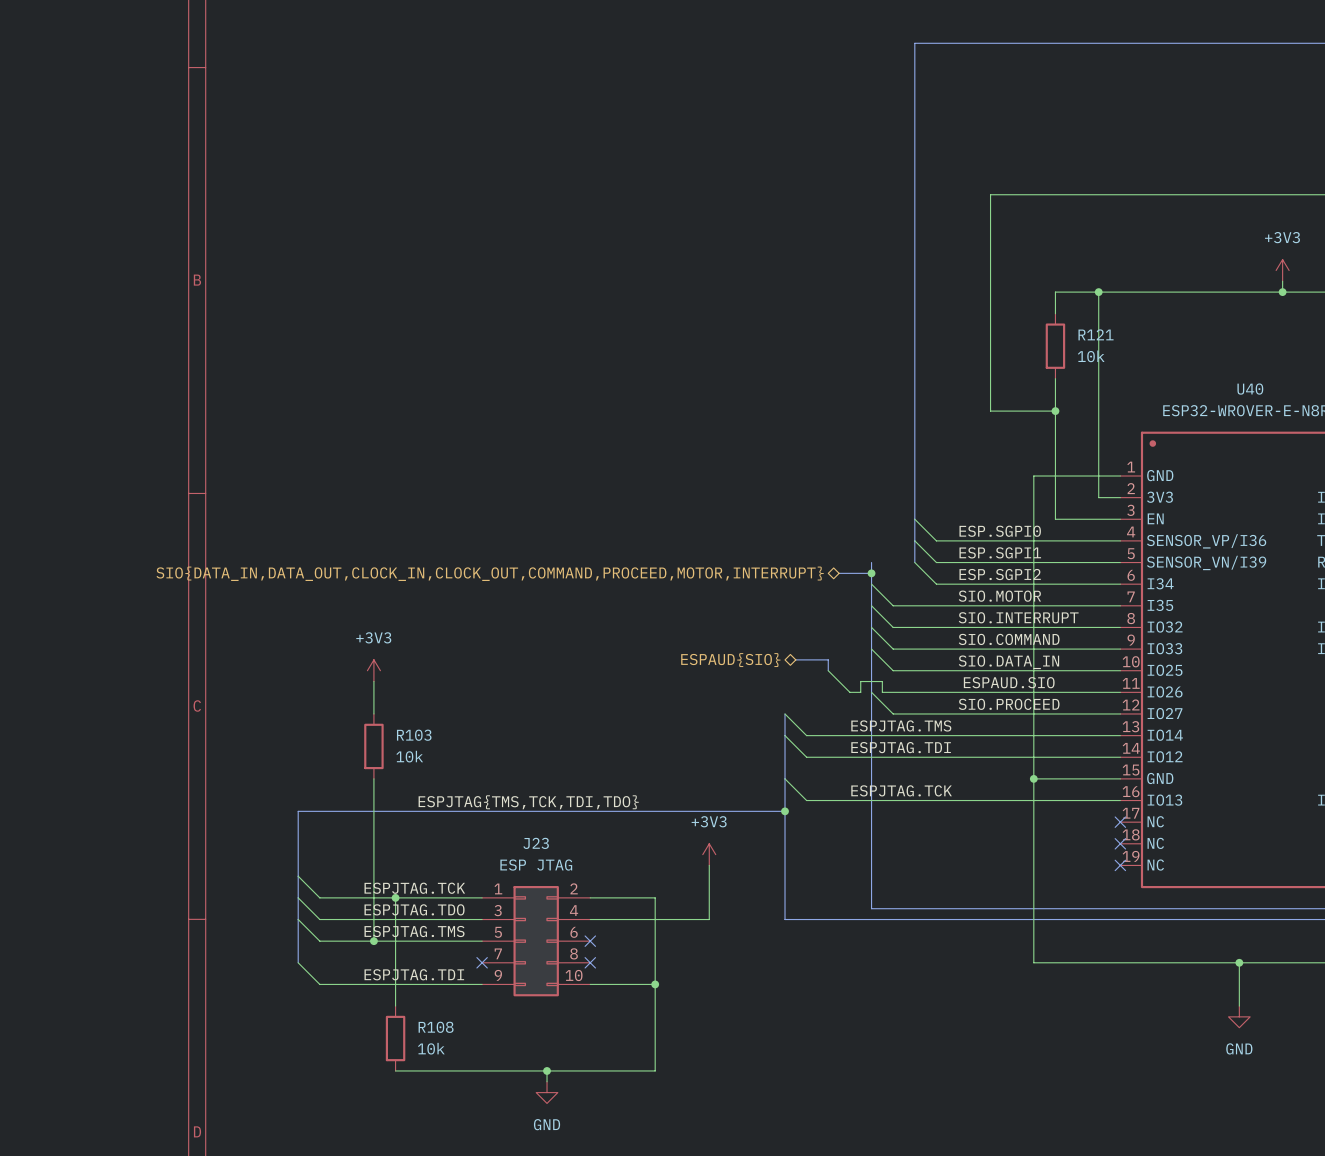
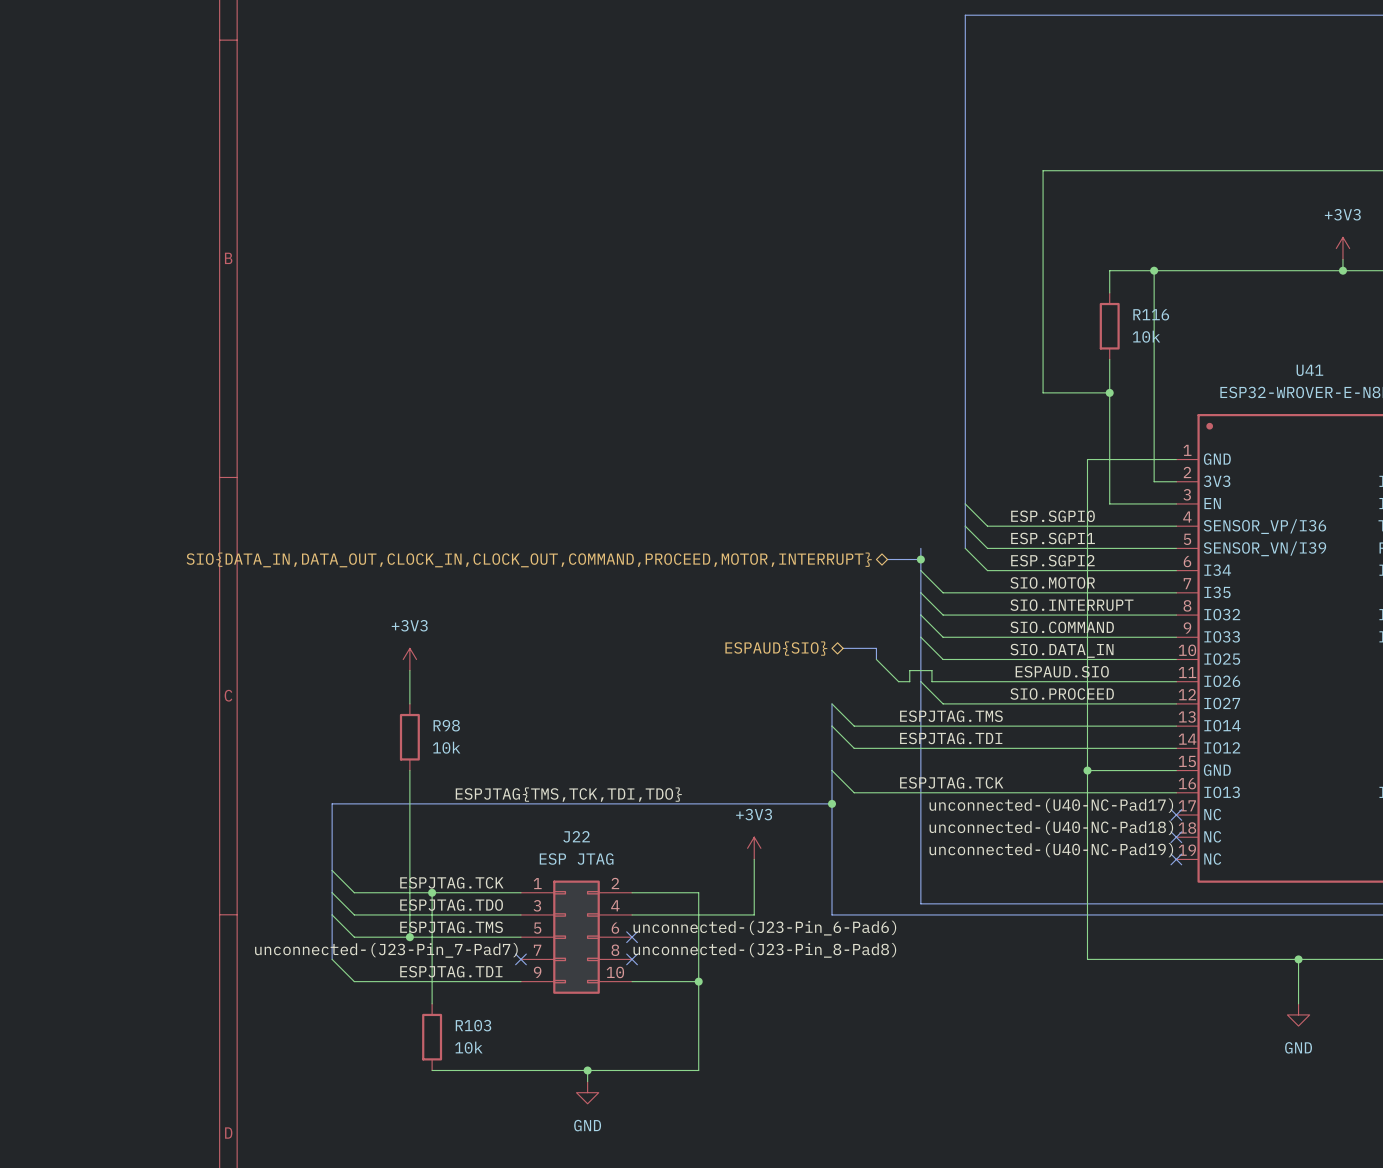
R121 name: R121 (1096, 334) -> R116 (1151, 314)
U40 name: U40 (1250, 389) -> U41 (1309, 370)
R103 name: R103 (414, 735) -> R98 (446, 725)
label: none -> unconnected-(U40-NC-Pad17) (1051, 805)
label: none -> unconnected-(U40-NC-Pad18) (1051, 827)
J23 name: J23 (536, 843) -> J22 (576, 836)
label: none -> unconnected-(U40-NC-Pad19) (1051, 850)
label: none -> unconnected-(J23-Pin_6-Pad6) (764, 928)
label: none -> unconnected-(J23-Pin_7-Pad7) (386, 950)
label: none -> unconnected-(J23-Pin_8-Pad8) (764, 950)
R108 name: R108 (436, 1027) -> R103 (473, 1025)

